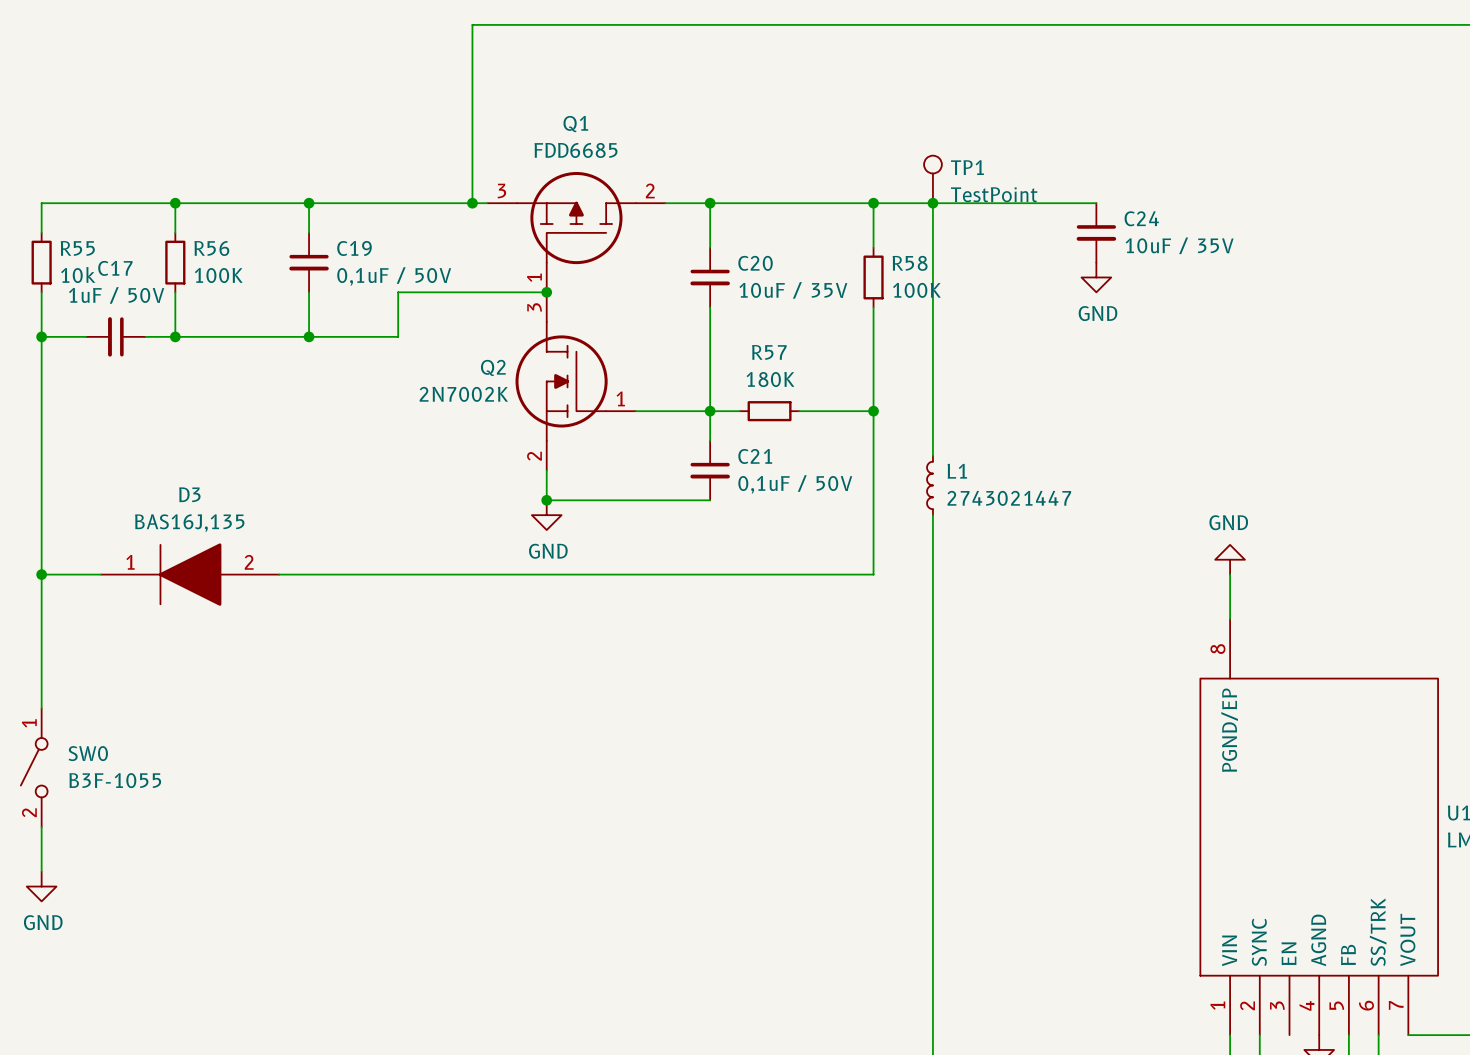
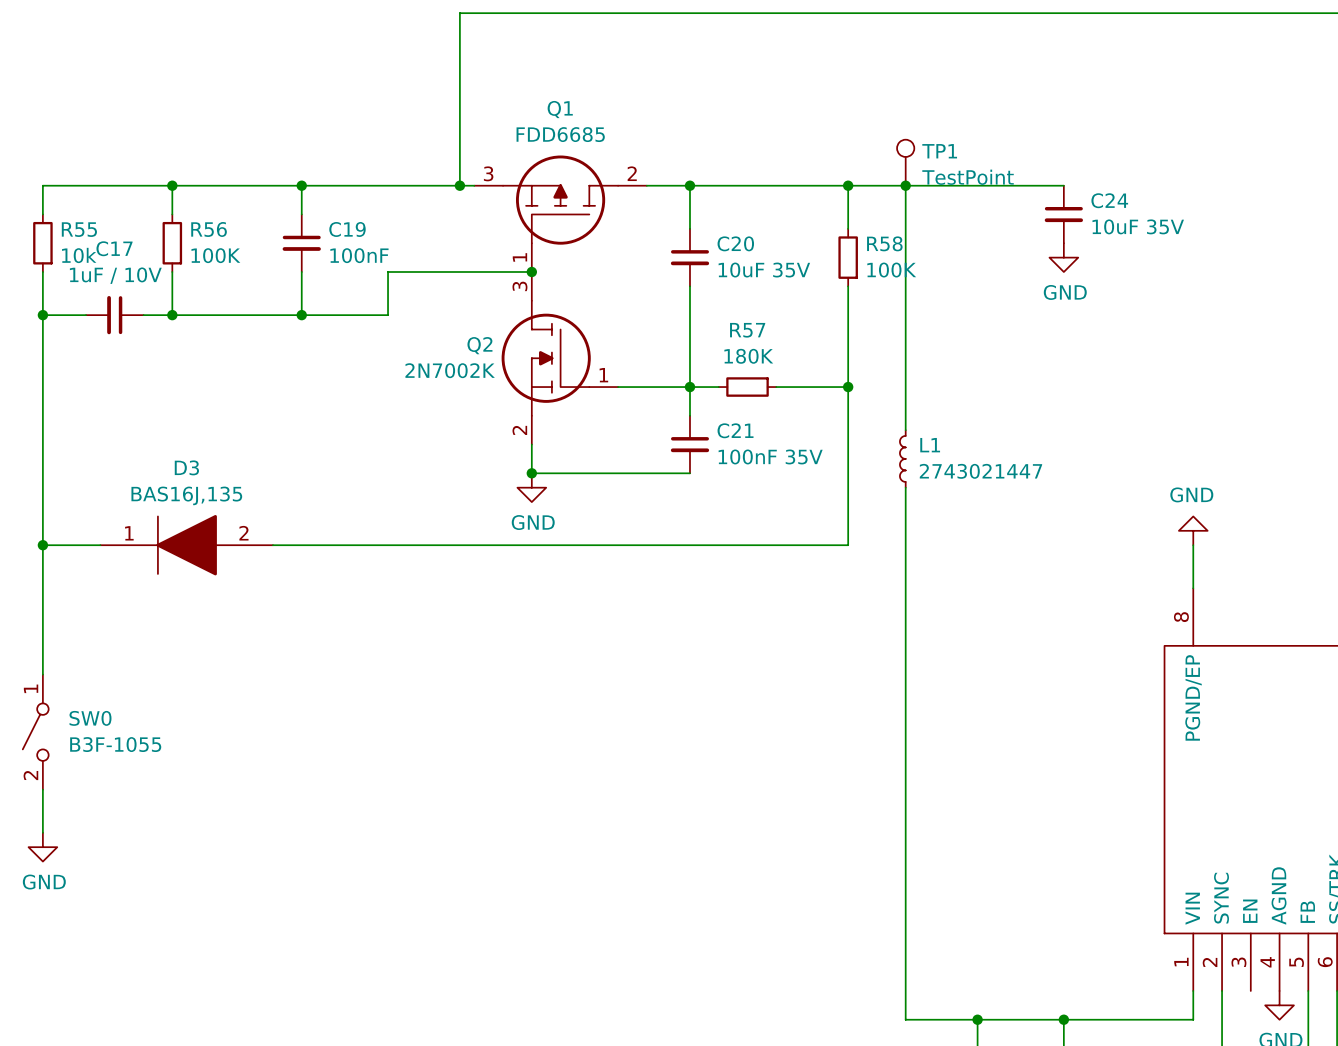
C24 value: 10uF / 35V (1179, 245) -> 10uF 35V (1138, 226)
C19 value: 0,1uF / 50V (394, 276) -> 100nF (359, 255)
C20 value: 10uF / 35V (793, 290) -> 10uF 35V (764, 270)
C17 value: 1uF / 50V (116, 295) -> 1uF / 10V (115, 275)
C21 value: 0,1uF / 50V (795, 484) -> 100nF 35V (770, 456)

